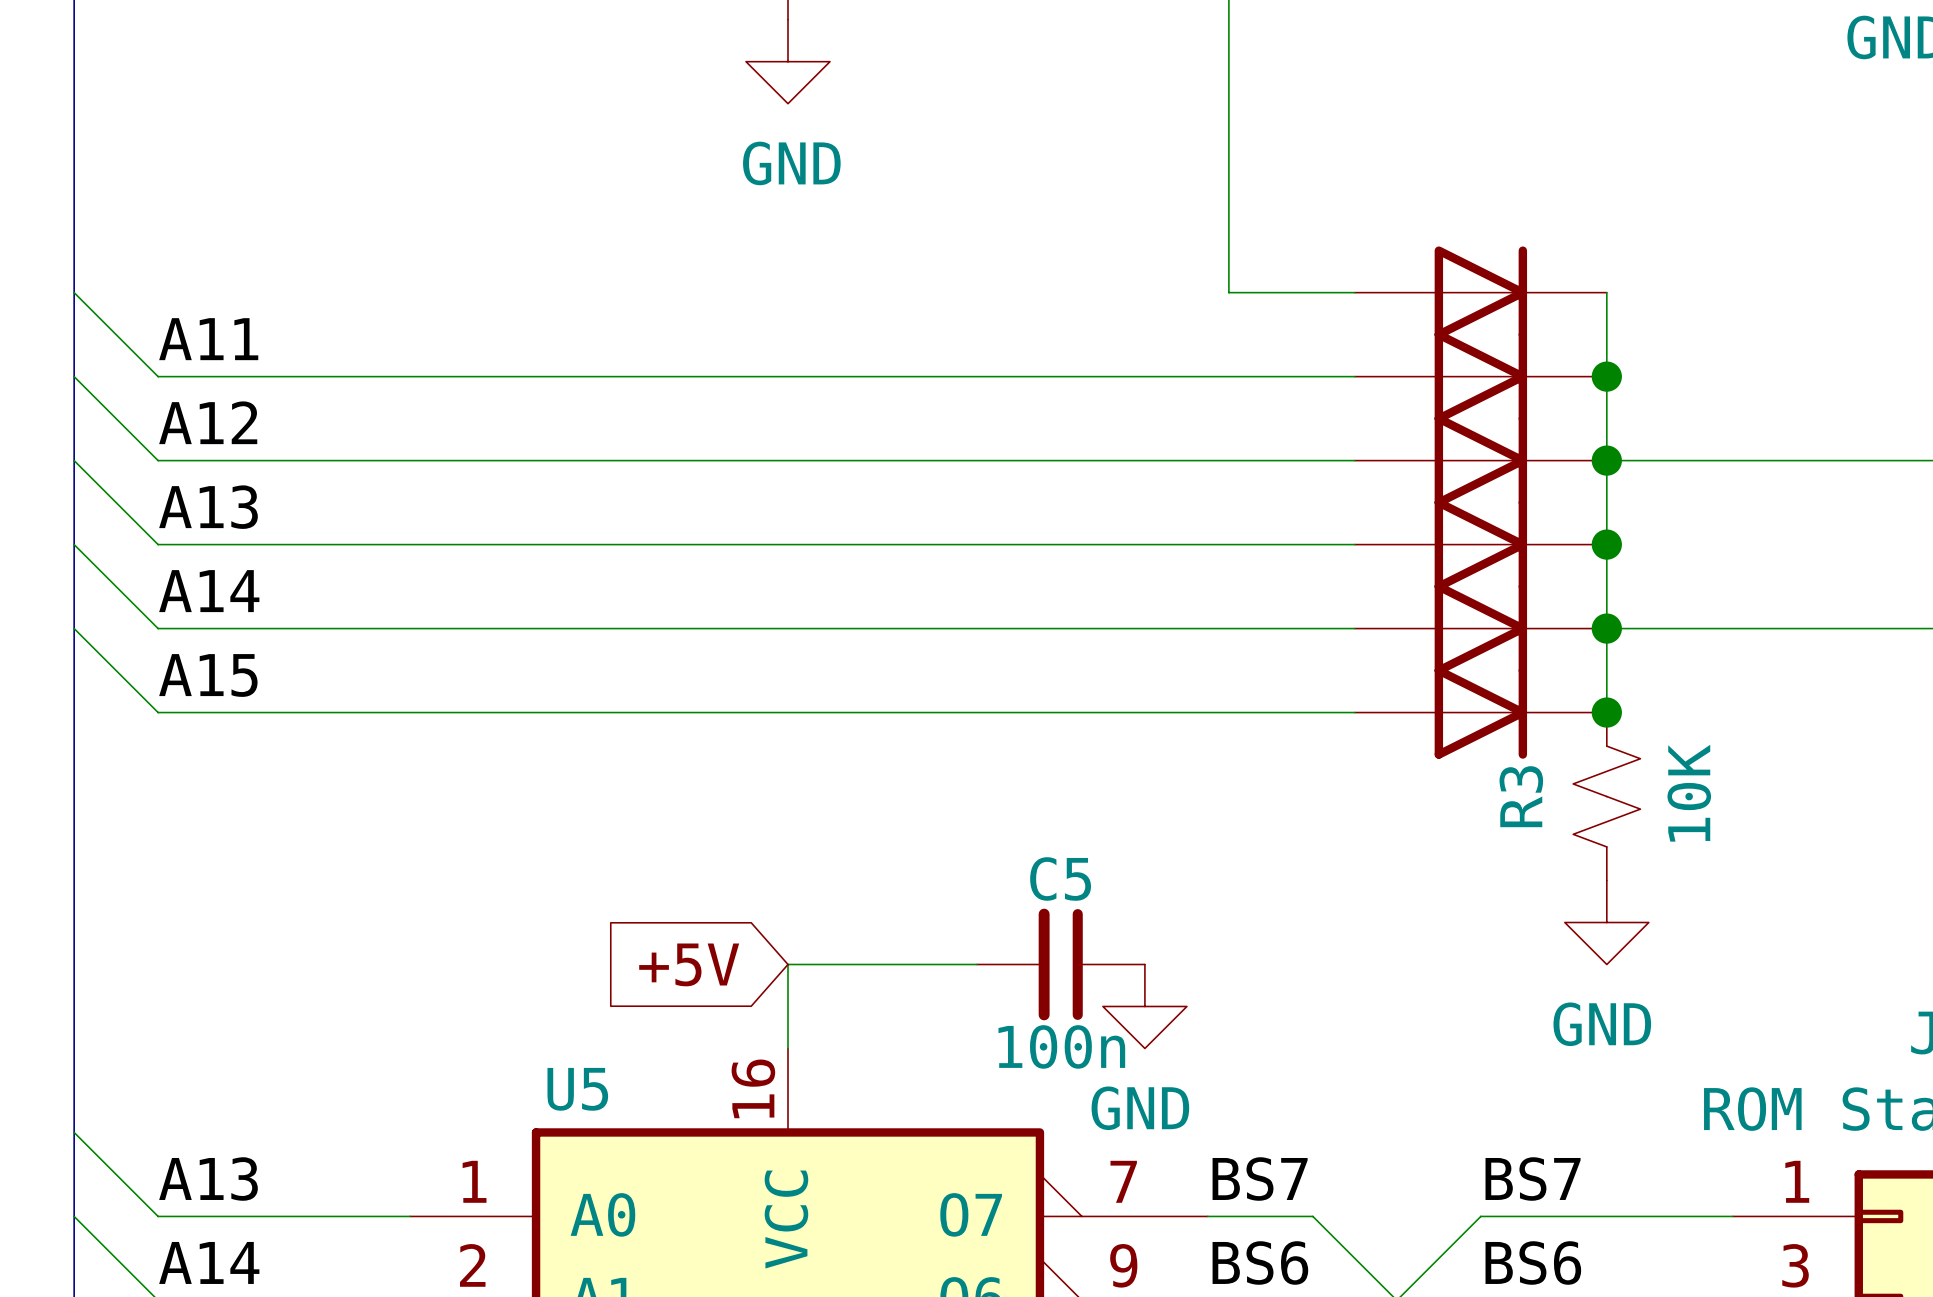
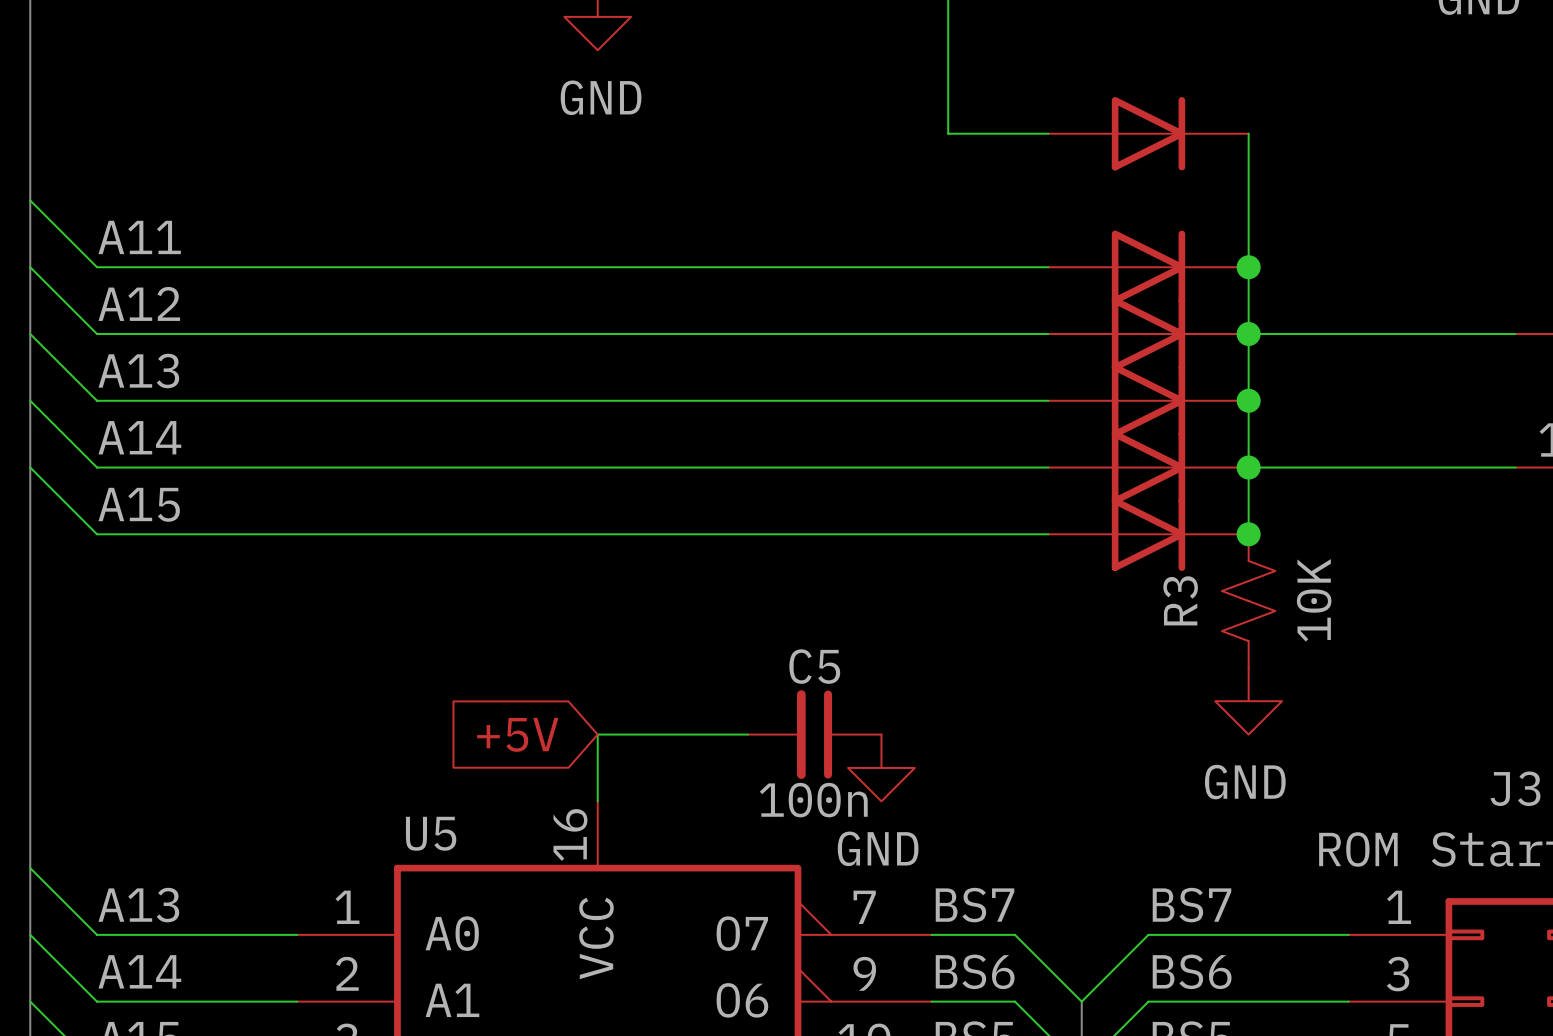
wire: (1228, 208) (1228, 292) (1354, 292) -> (948, 133) (1048, 133)
wire: none -> (1248, 133) (1248, 200)
part position: (1480, 292) -> (1148, 133)

